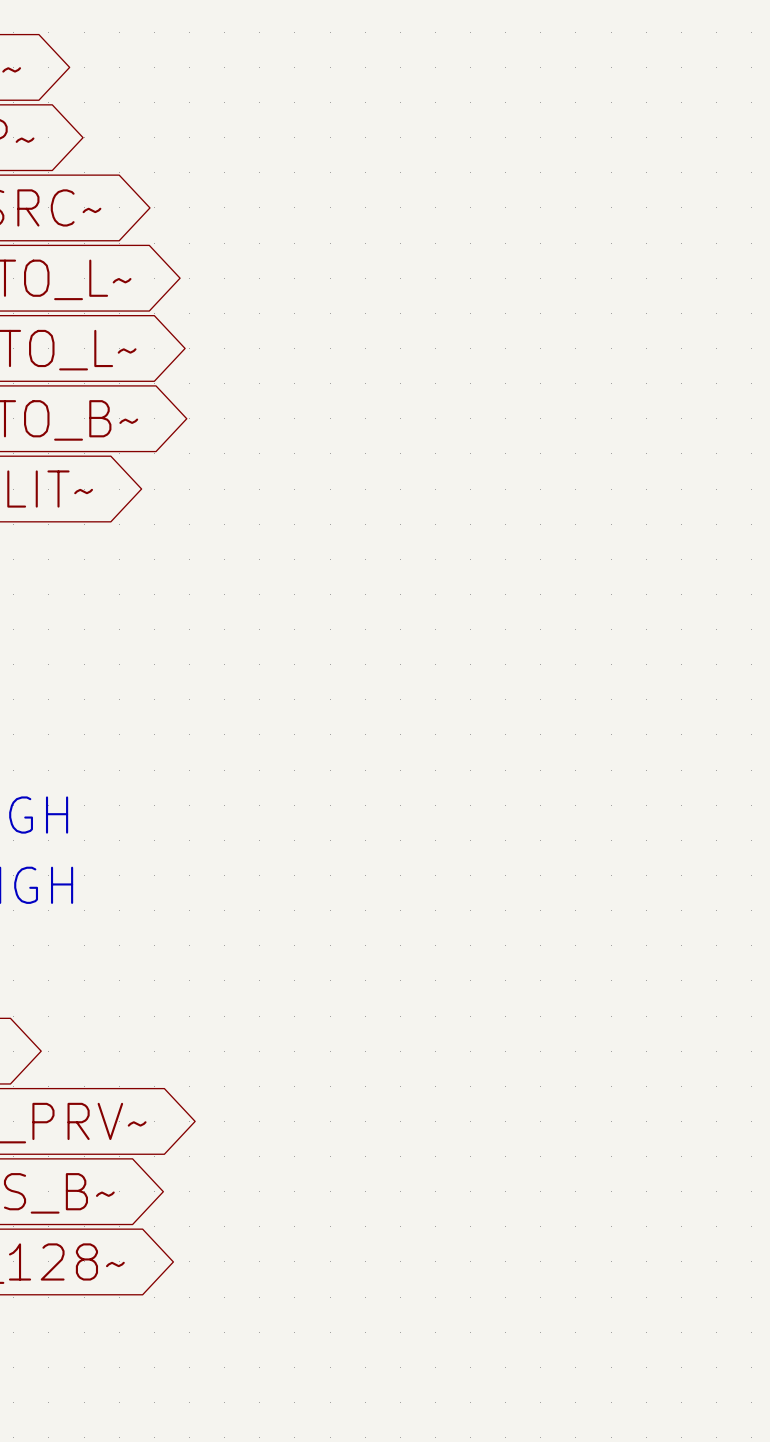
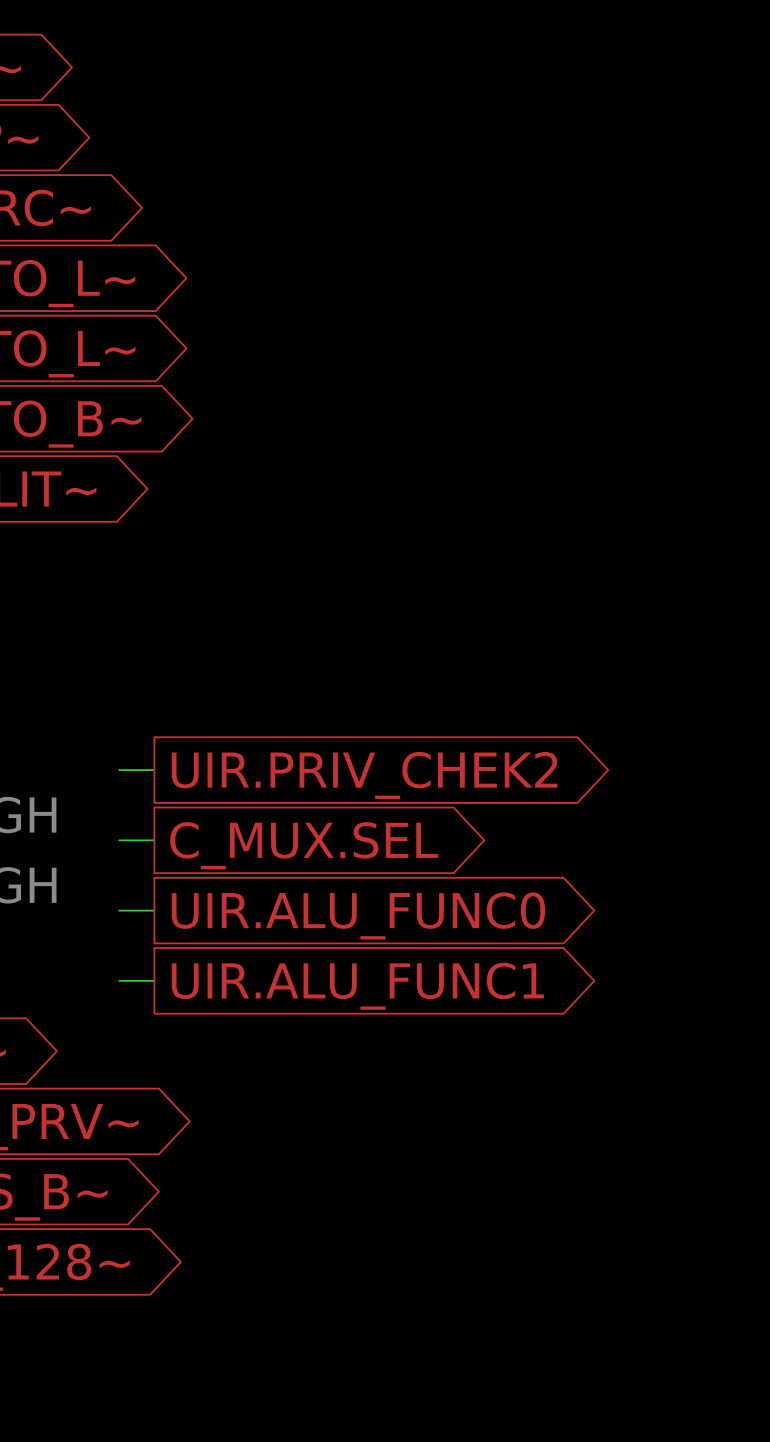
wire: none -> (119, 770) (154, 770)
global label: none -> UIR.PRIV_CHEK2 (364, 775)
wire: none -> (119, 840) (154, 840)
global label: none -> C_MUX.SEL (304, 845)
wire: none -> (119, 910) (154, 910)
global label: none -> UIR.ALU_FUNC0 (358, 915)
wire: none -> (119, 980) (154, 980)
global label: none -> UIR.ALU_FUNC1 (357, 986)

